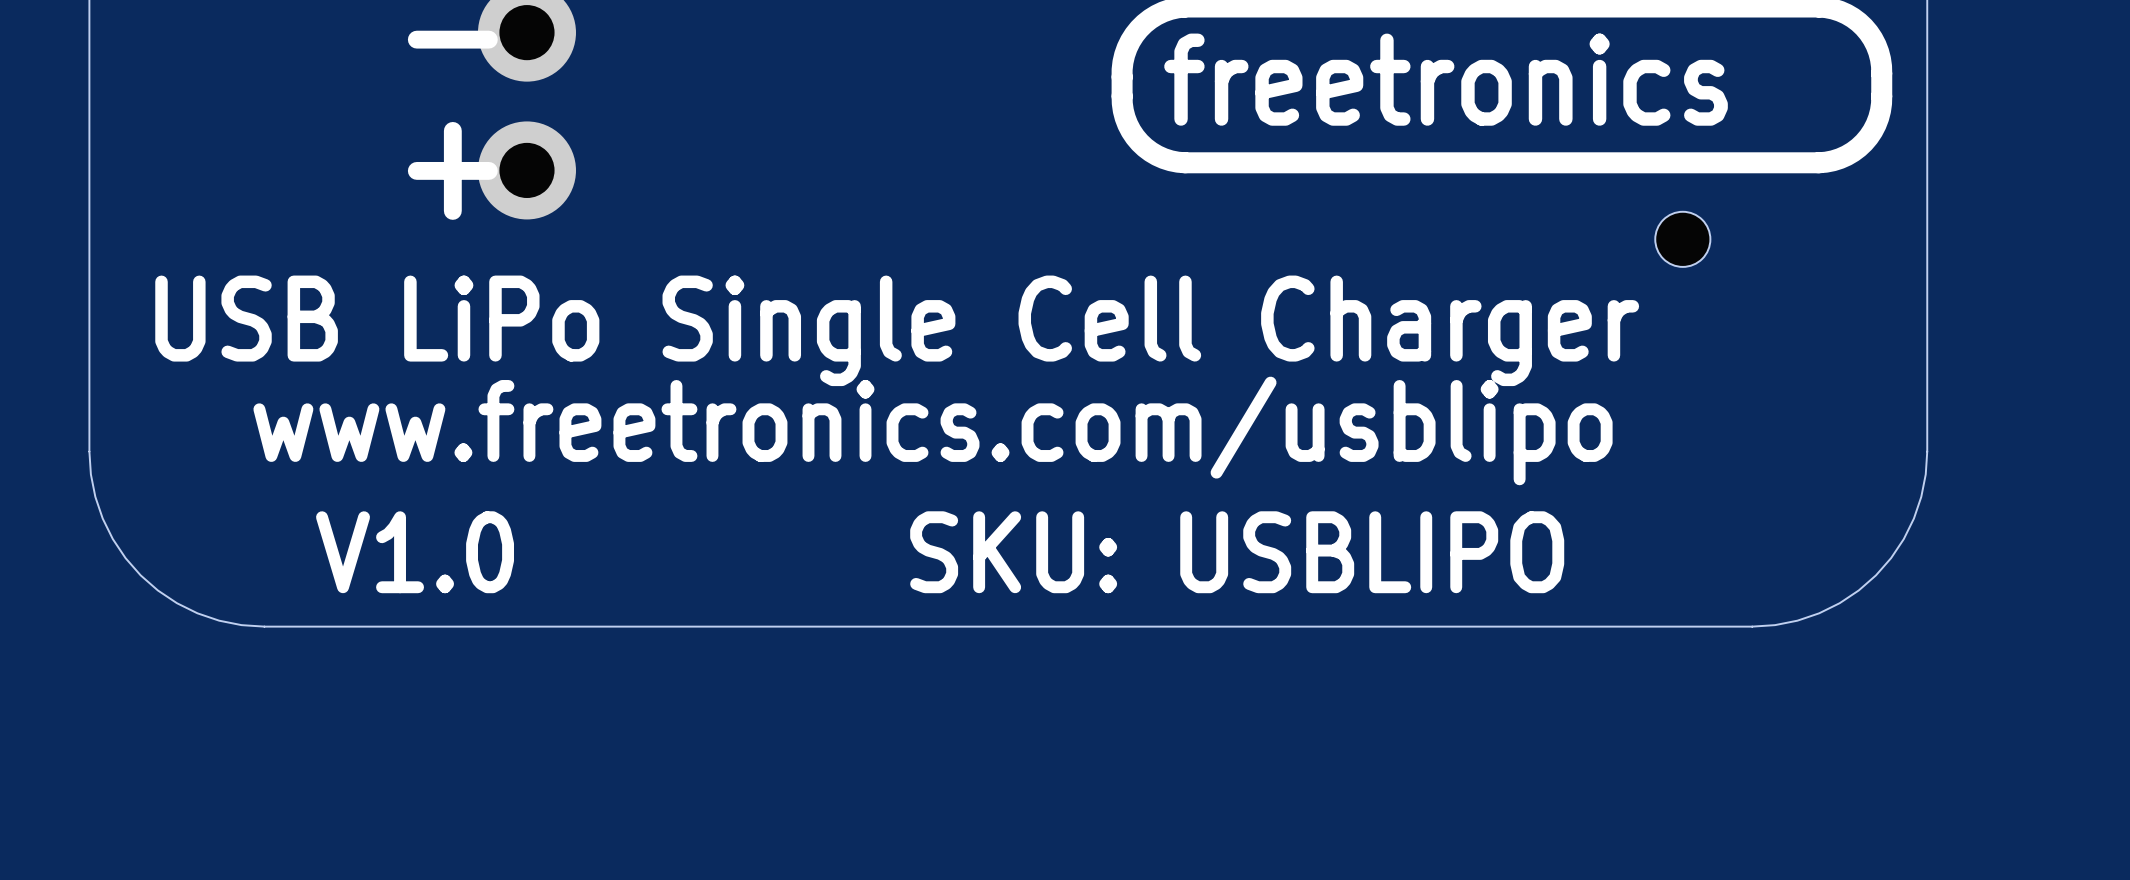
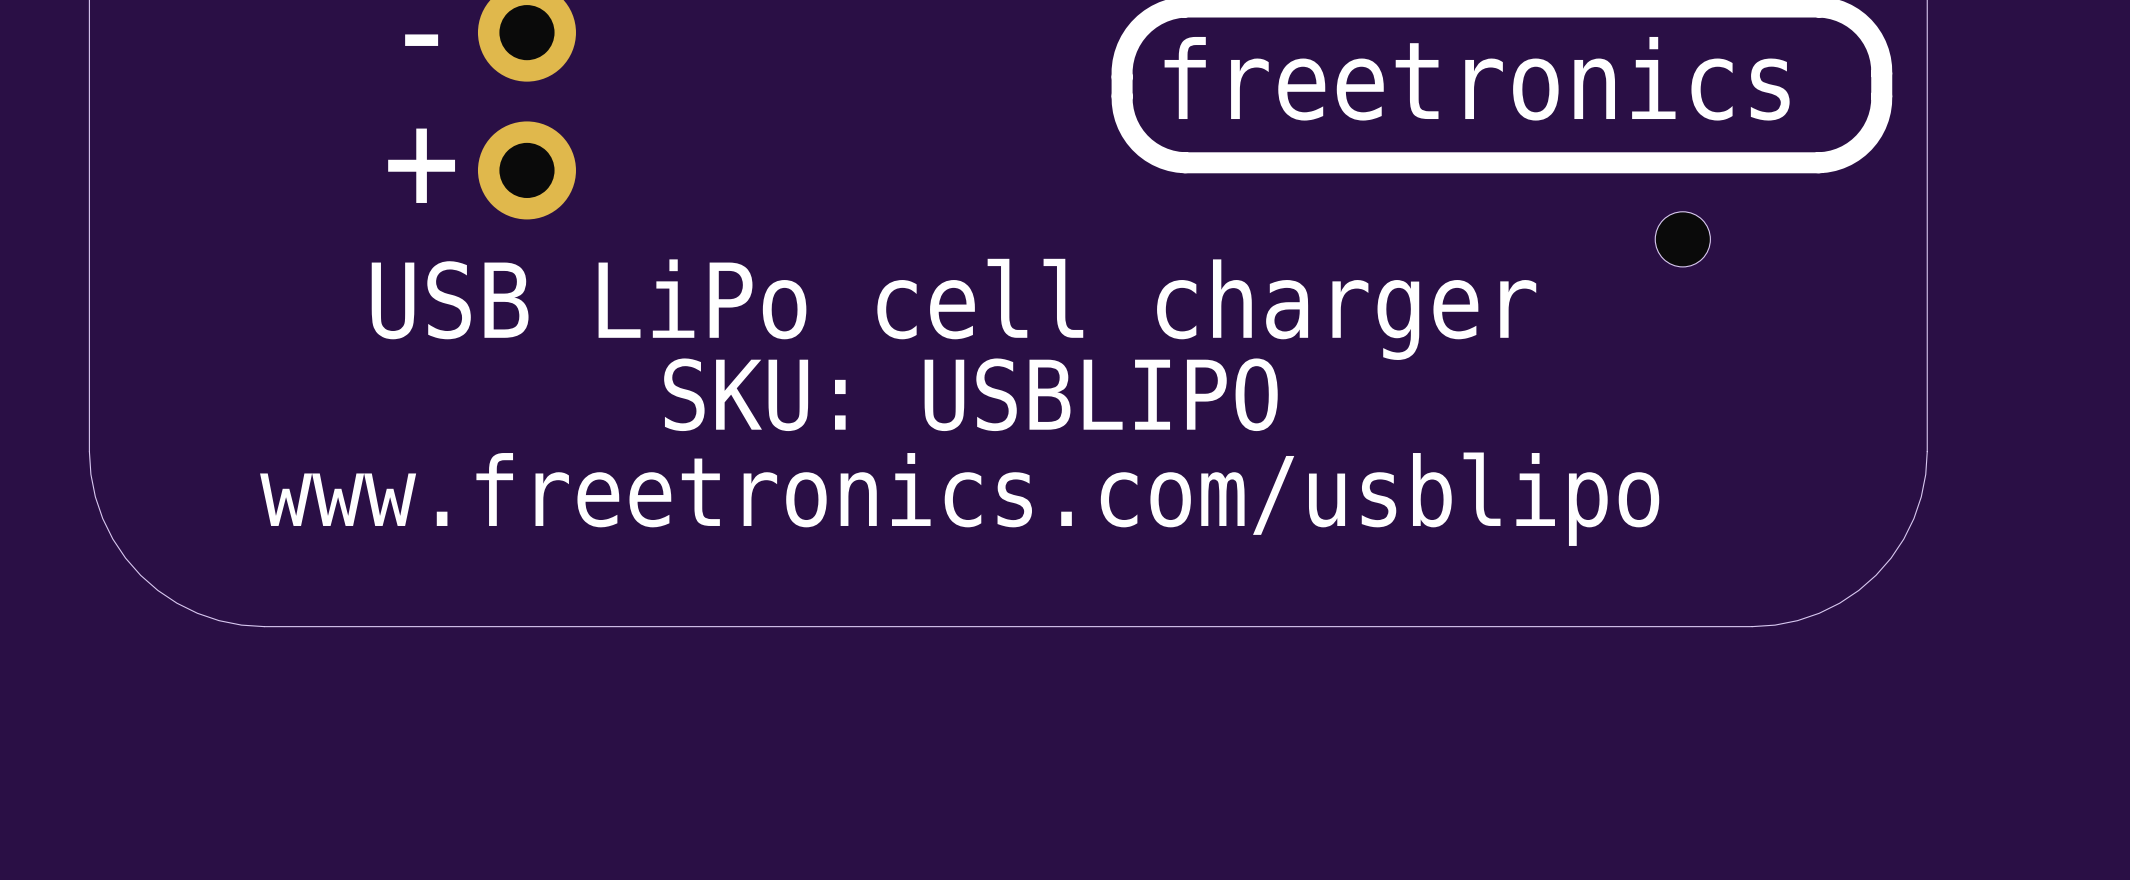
text: USB LiPo Single Cell Charger (897, 330) -> USB LiPo cell charger (953, 309)
text: none -> SKU: USBLIPO (970, 394)
text position: www.freetronics.com/usblipo (933, 430) -> www.freetronics.com/usblipo (959, 499)
text: V1.0 SKU: USBLIPO (940, 552) -> none

